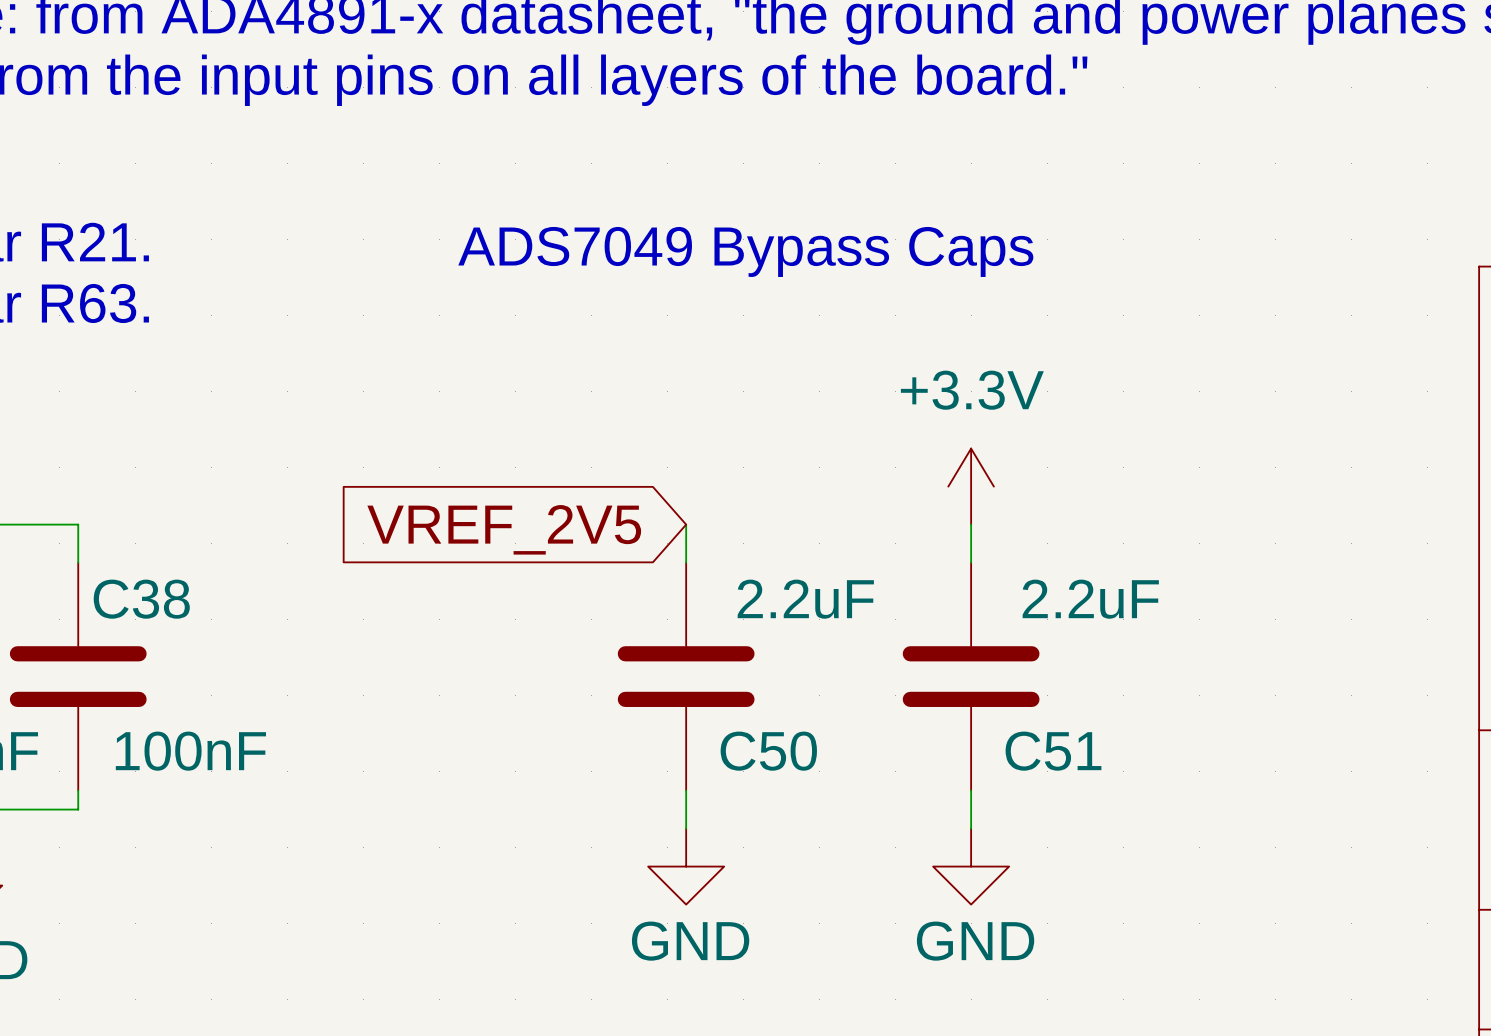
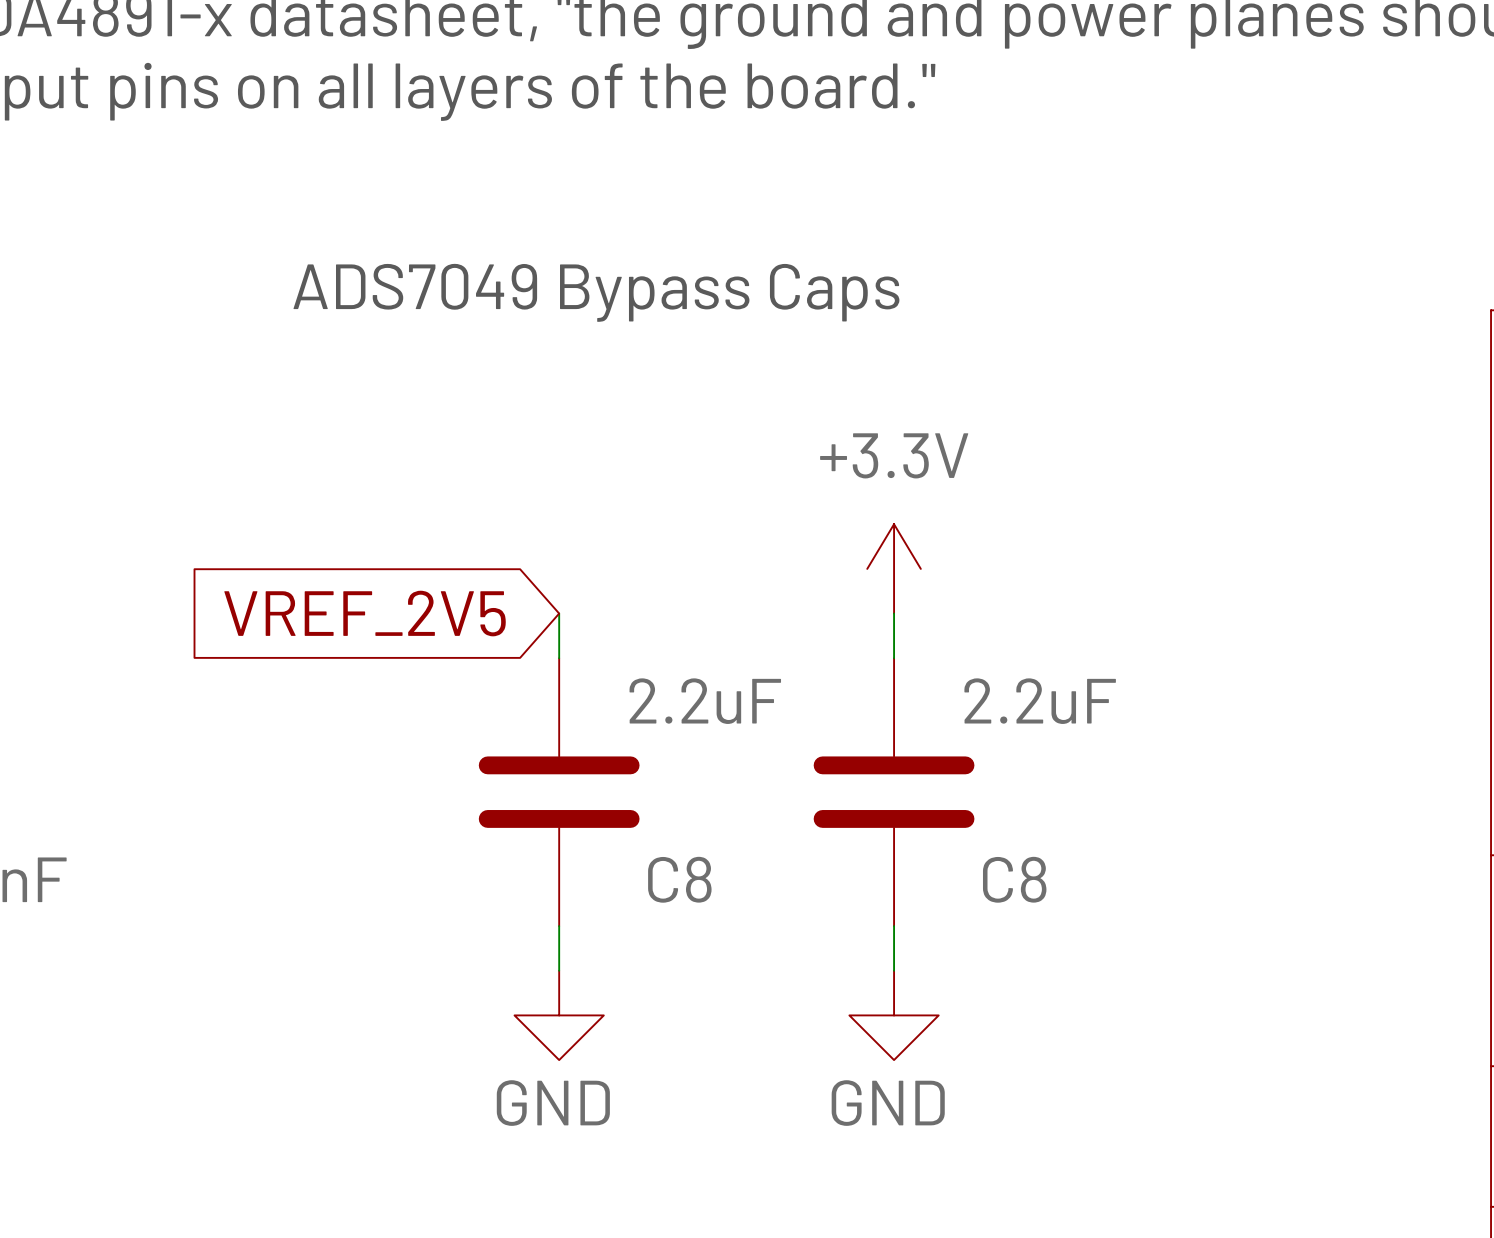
C50 name: C50 (768, 751) -> C8 (679, 879)
C51 name: C51 (1053, 751) -> C8 (1014, 879)

